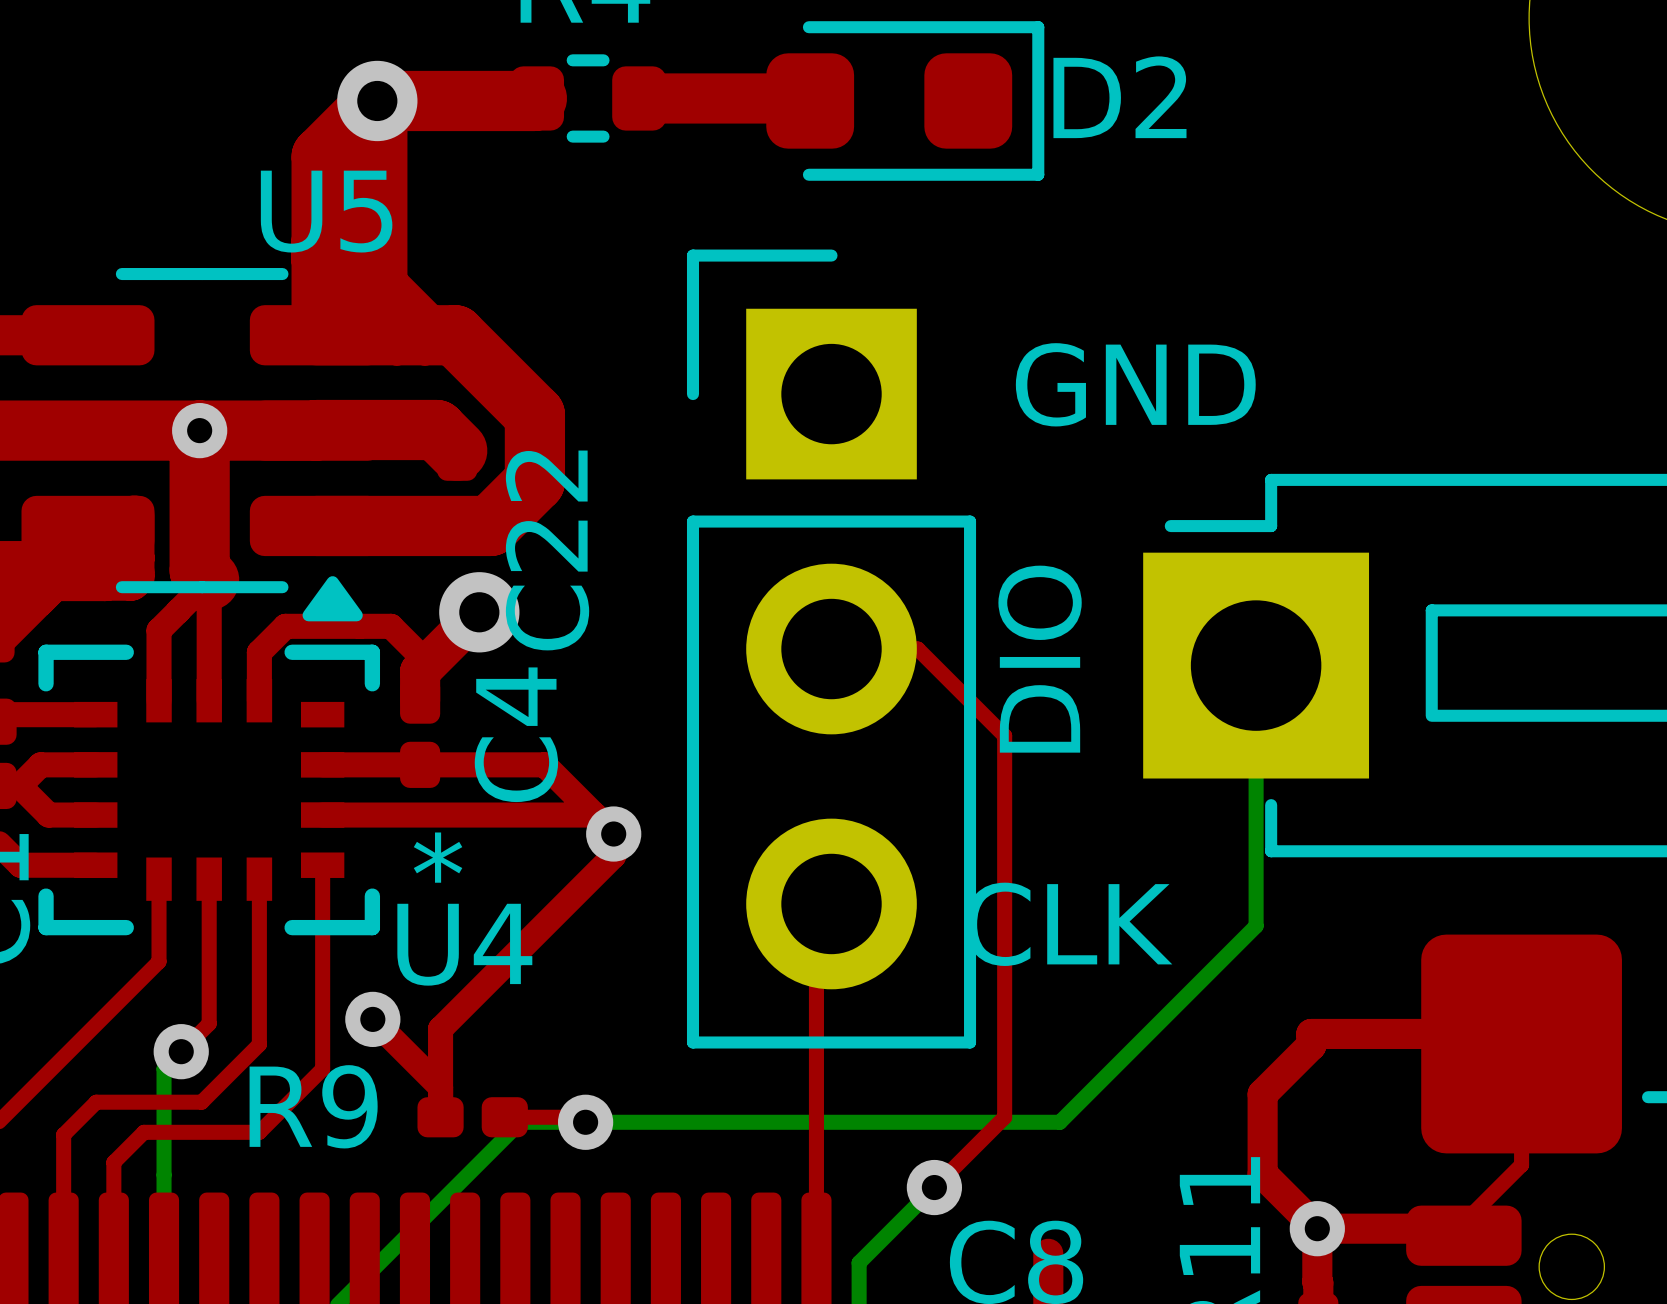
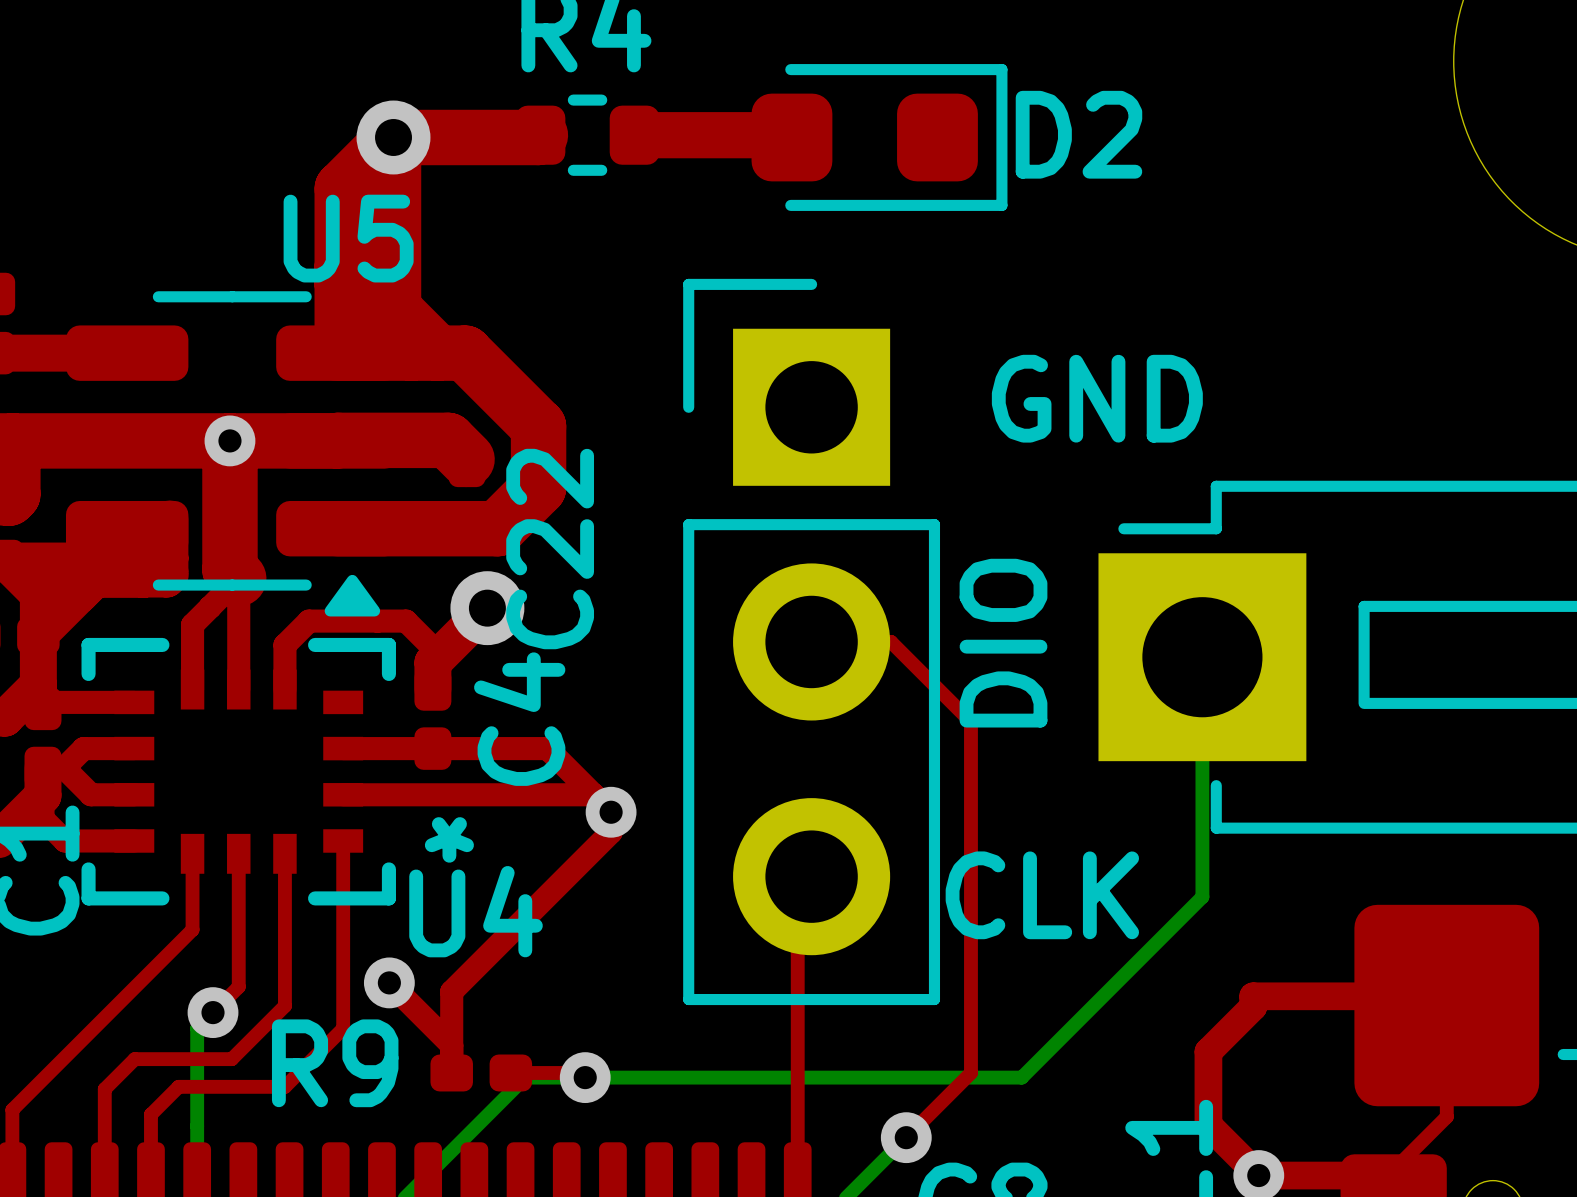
part footprint: [686, 249, 977, 1049] -> [683, 278, 941, 1006]

